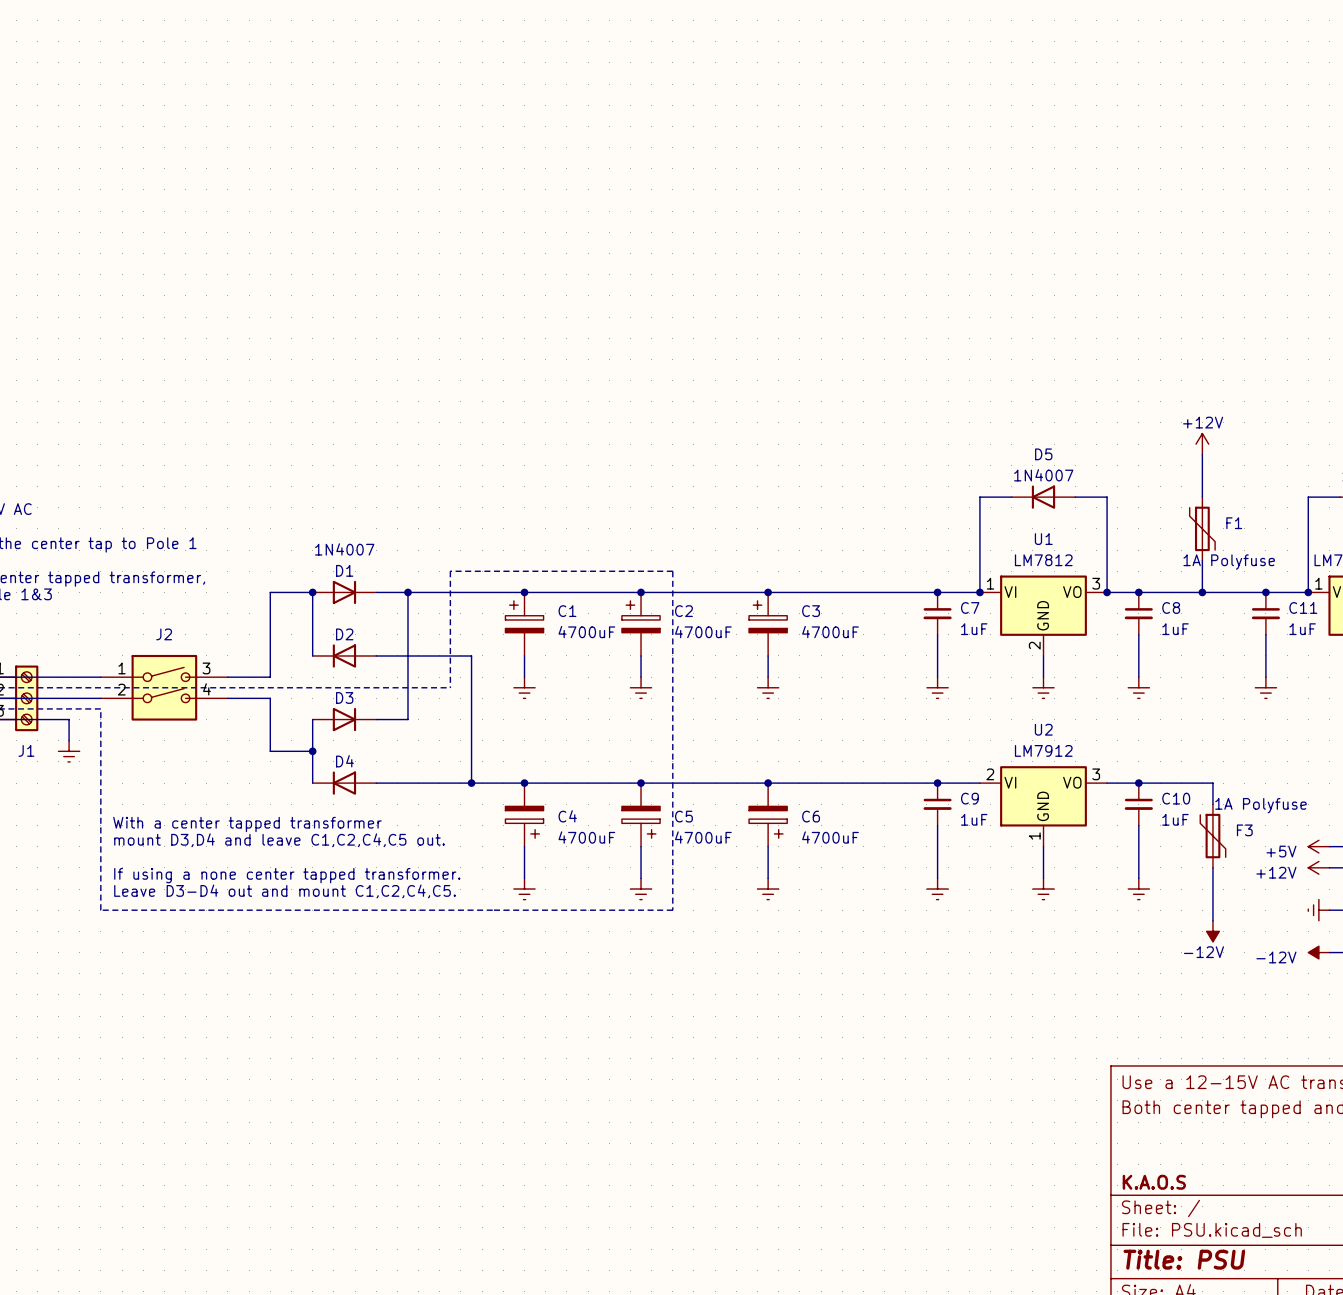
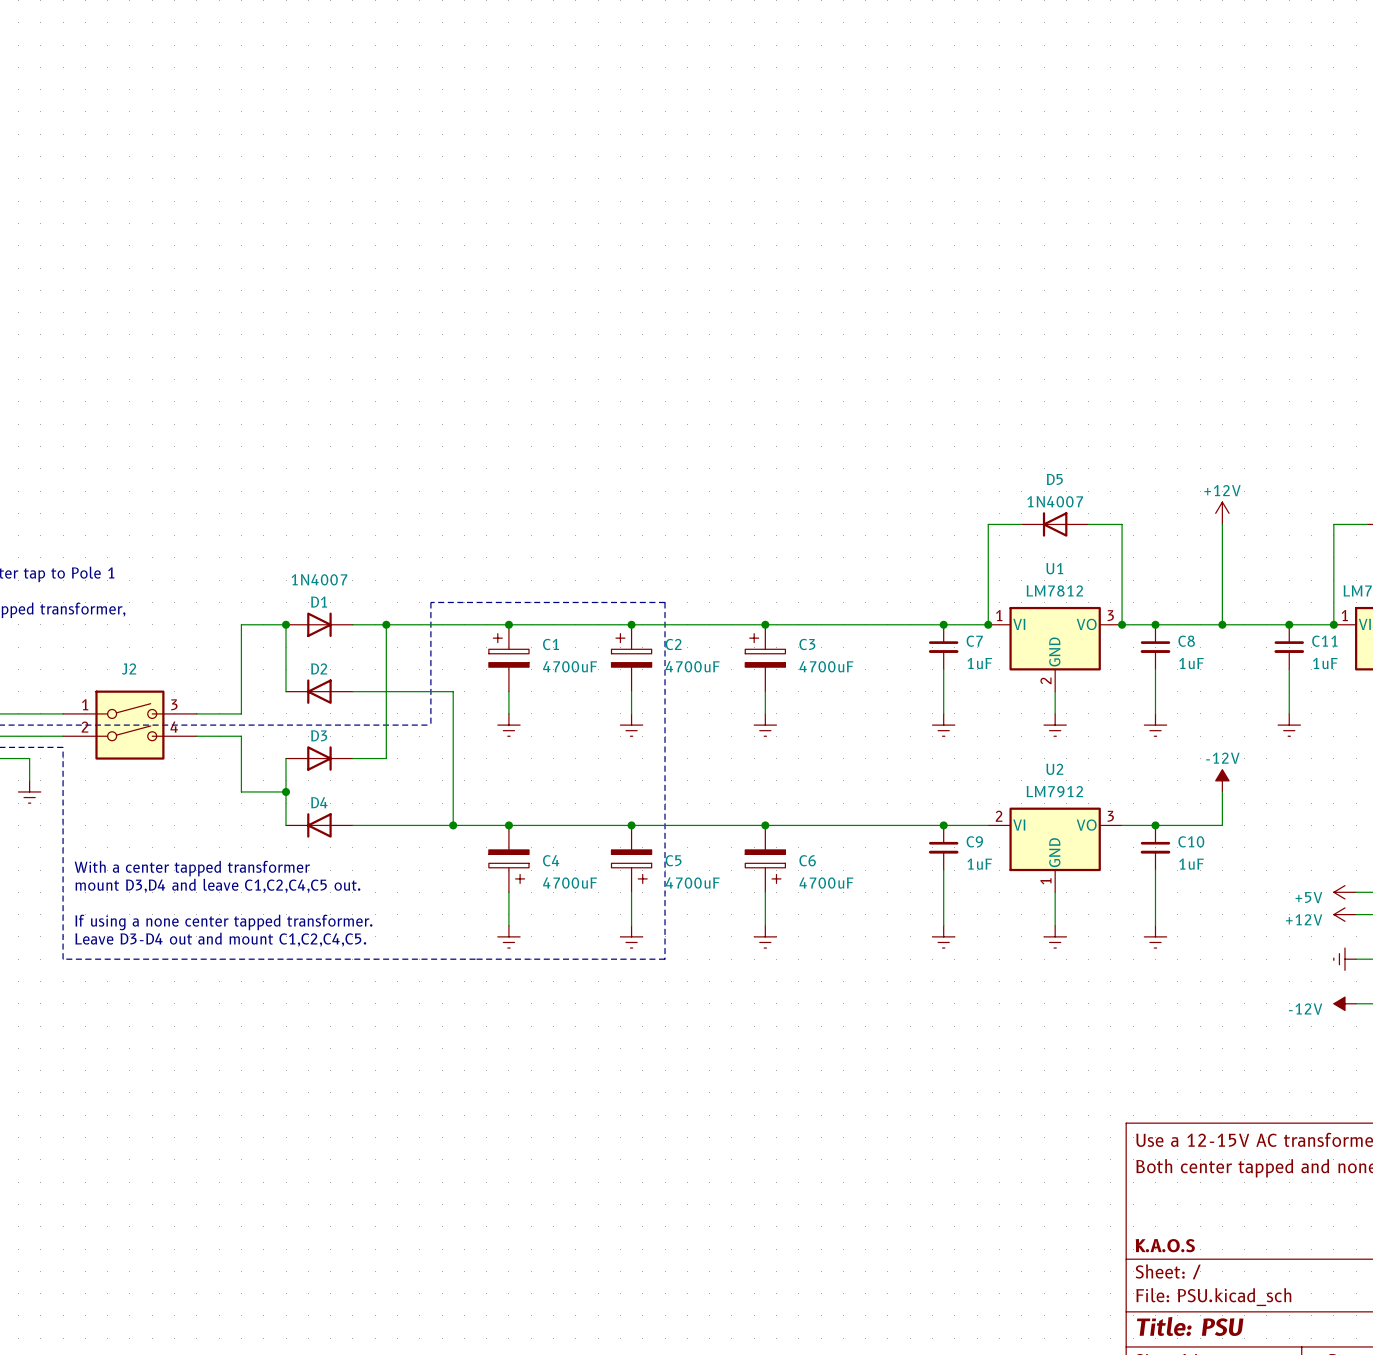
power symbol position: +12V (1202, 444) -> +12V (1222, 513)
F1: 1A Polyfuse (1202, 528) -> none
wire: (1202, 783) (1212, 783) (1212, 804) -> (1222, 825) (1222, 791)
F3: 1A Polyfuse (1212, 836) -> none
wire: (1212, 867) (1212, 920) -> none
power symbol rotation: 0° (1212, 931) -> 180° (1222, 780)
power symbol position: -12V (1212, 931) -> -12V (1222, 780)

